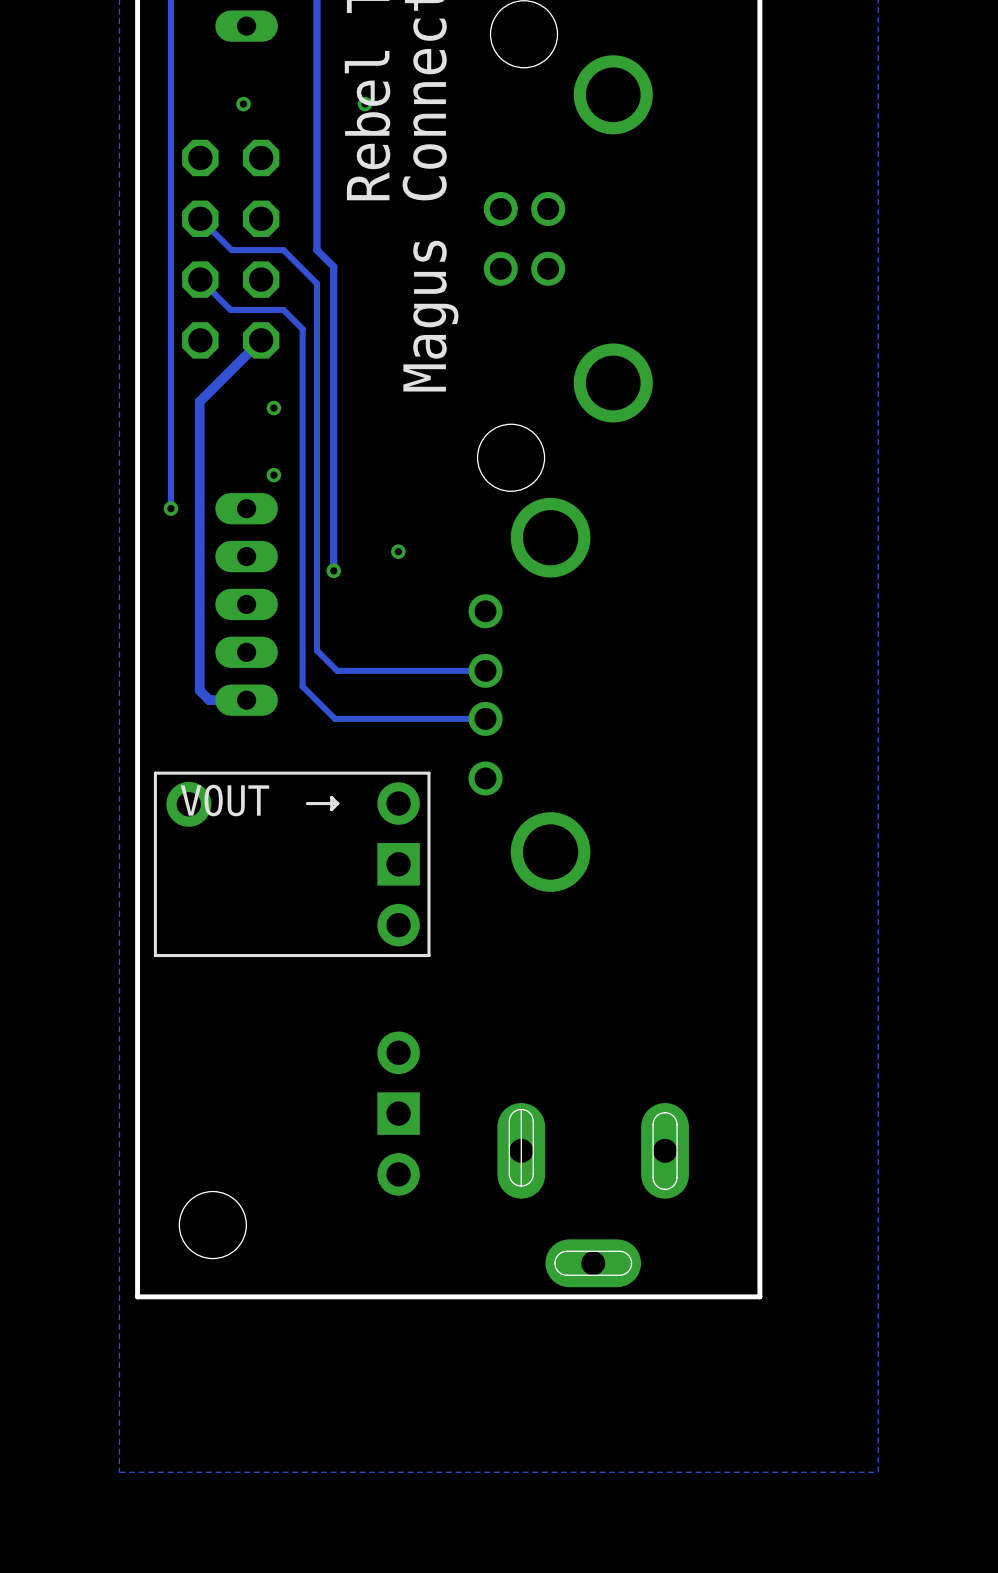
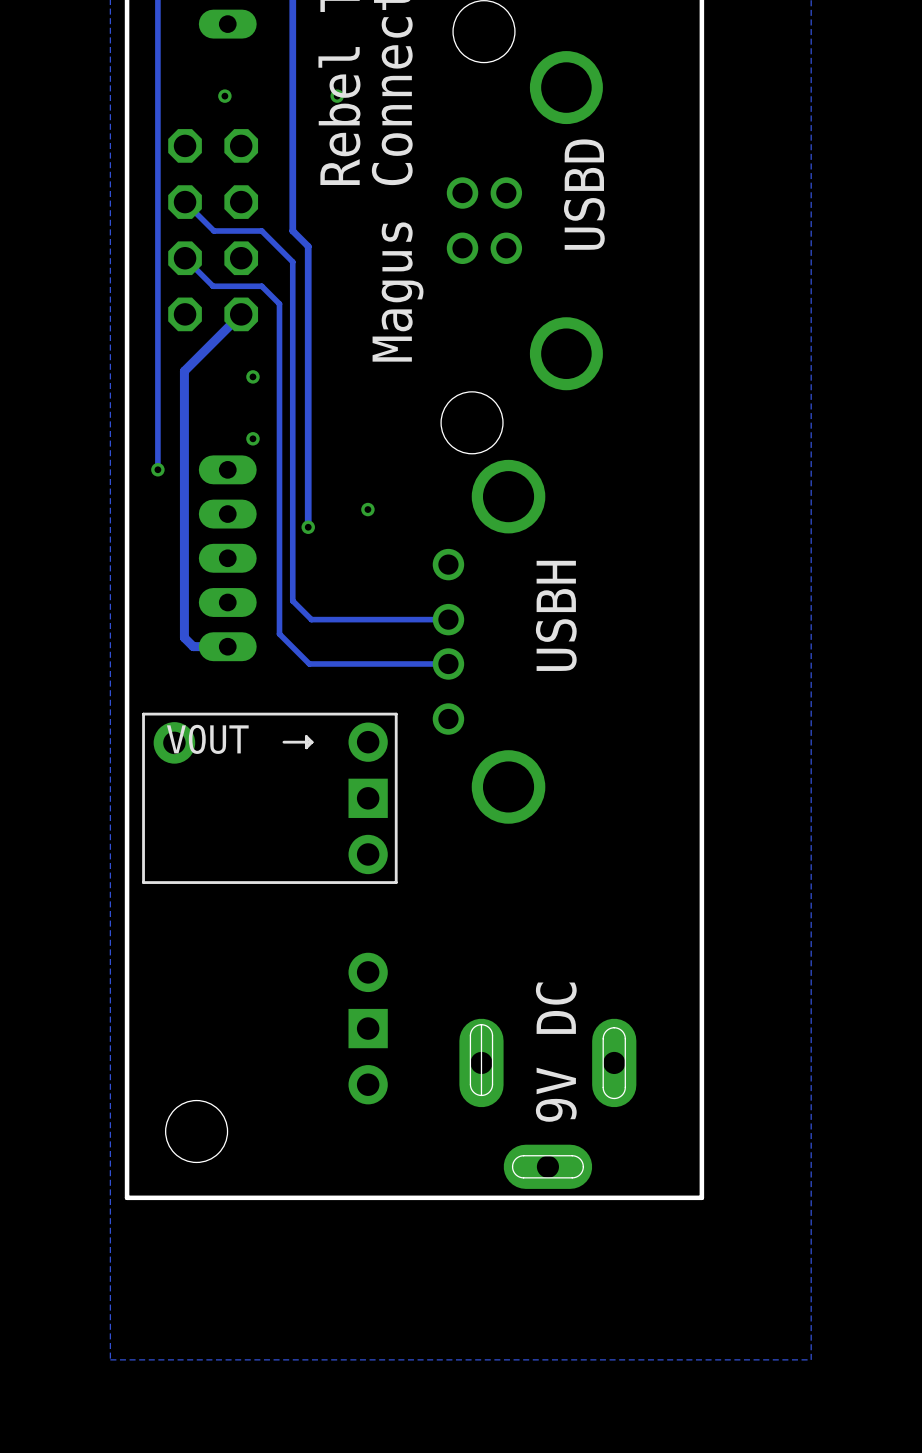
text: none -> USBD (584, 194)
text: none -> USBH (556, 615)
text: none -> 9V DC (556, 1052)

